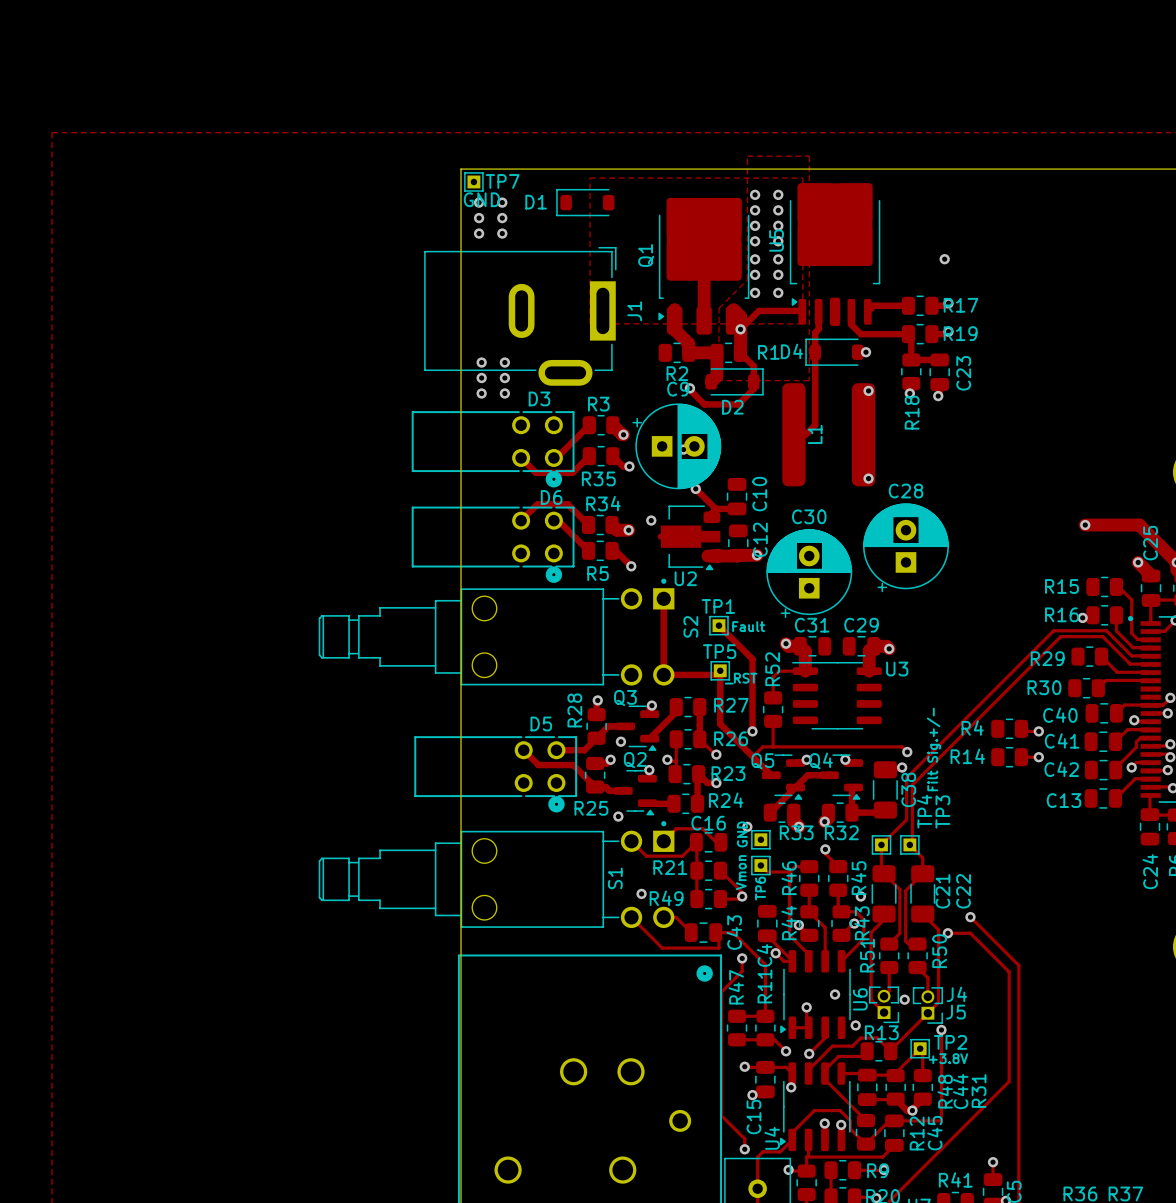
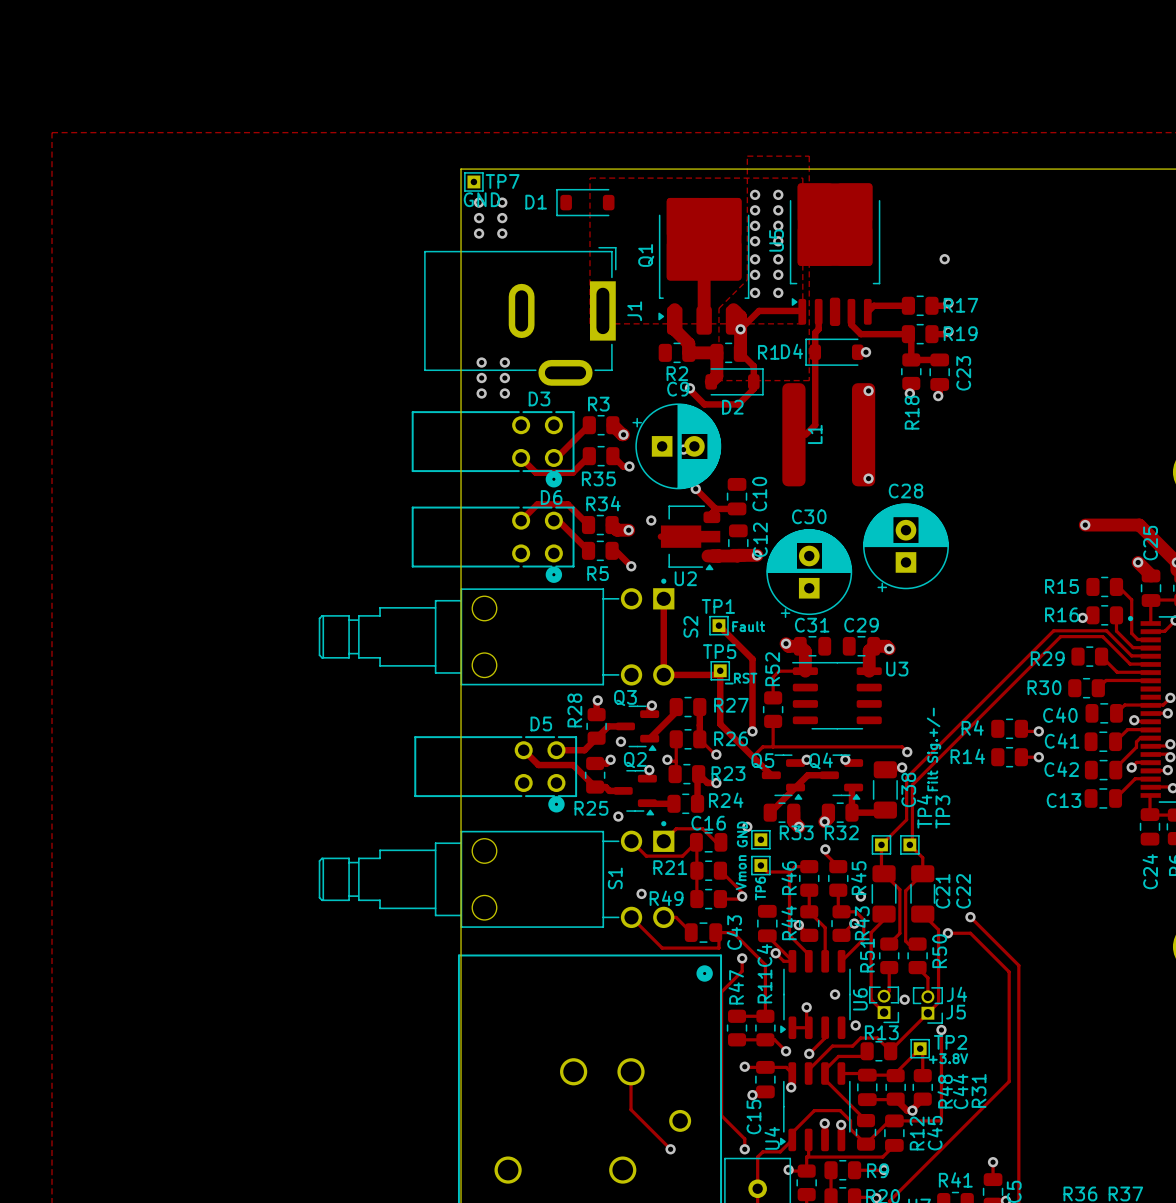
track: none -> (631, 1071) (631, 1109) (670, 1149)
via: none -> (670, 1149)

